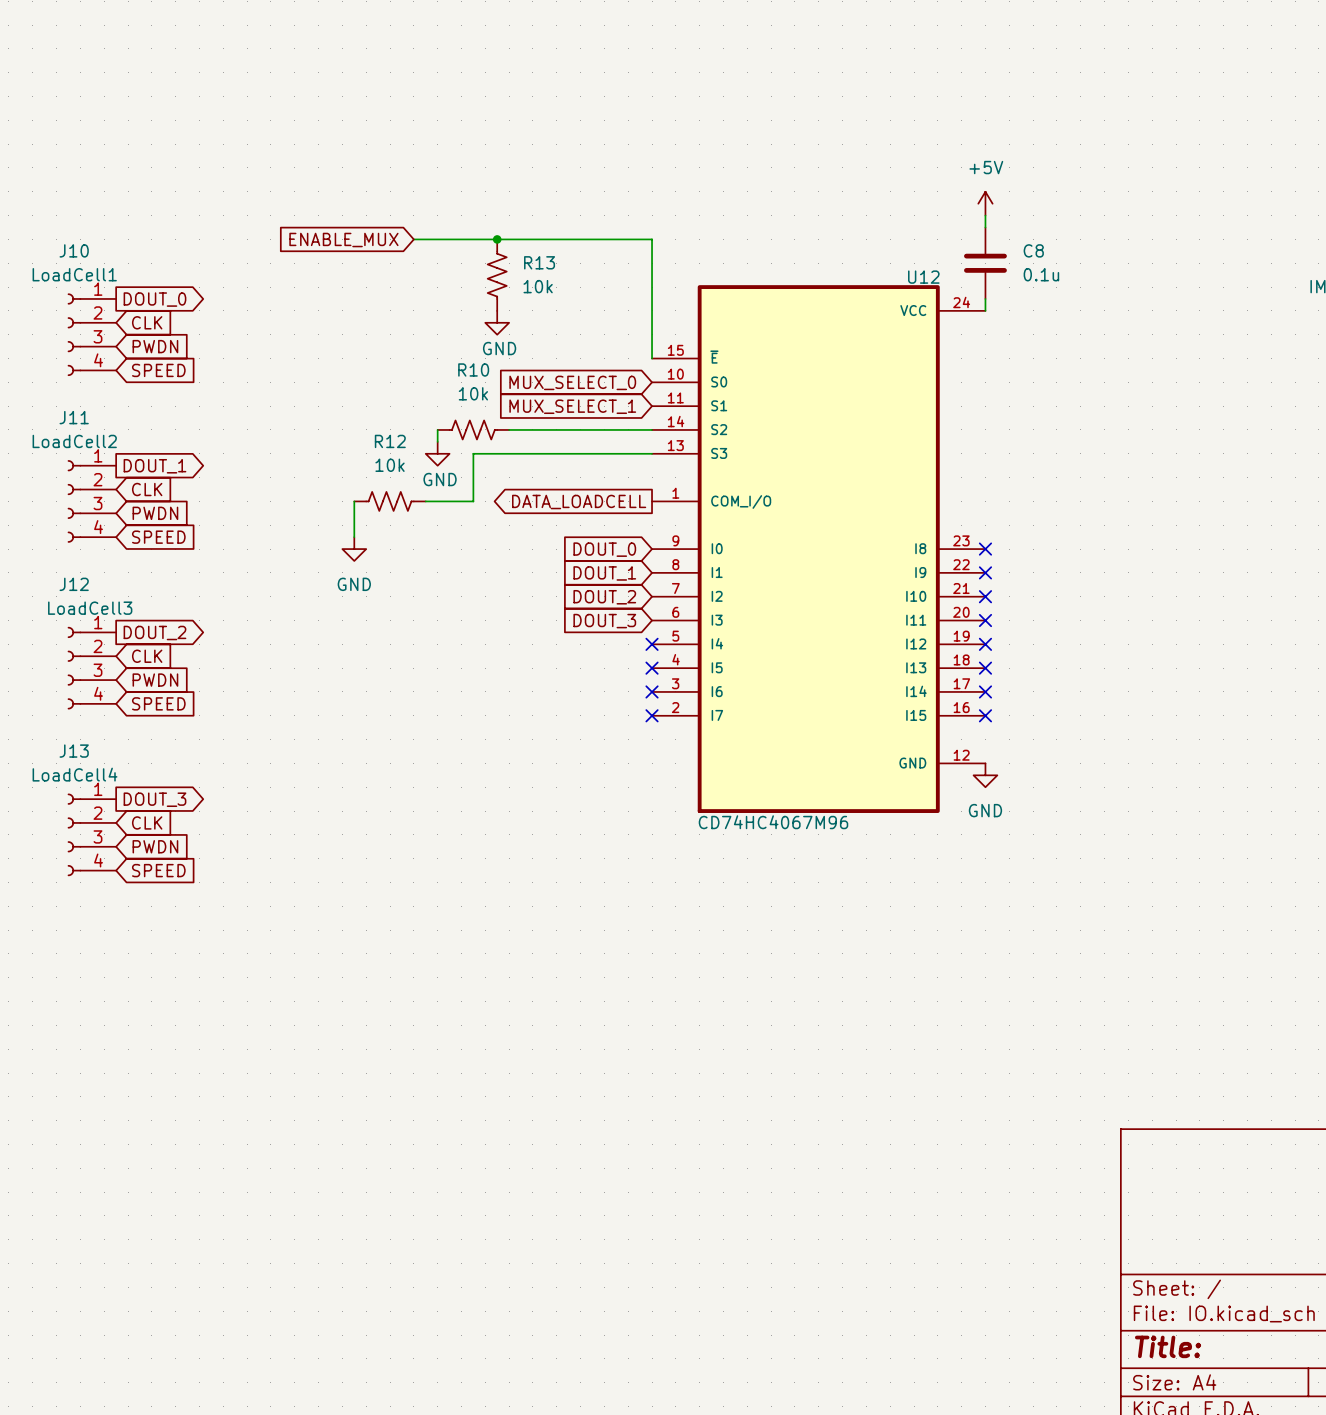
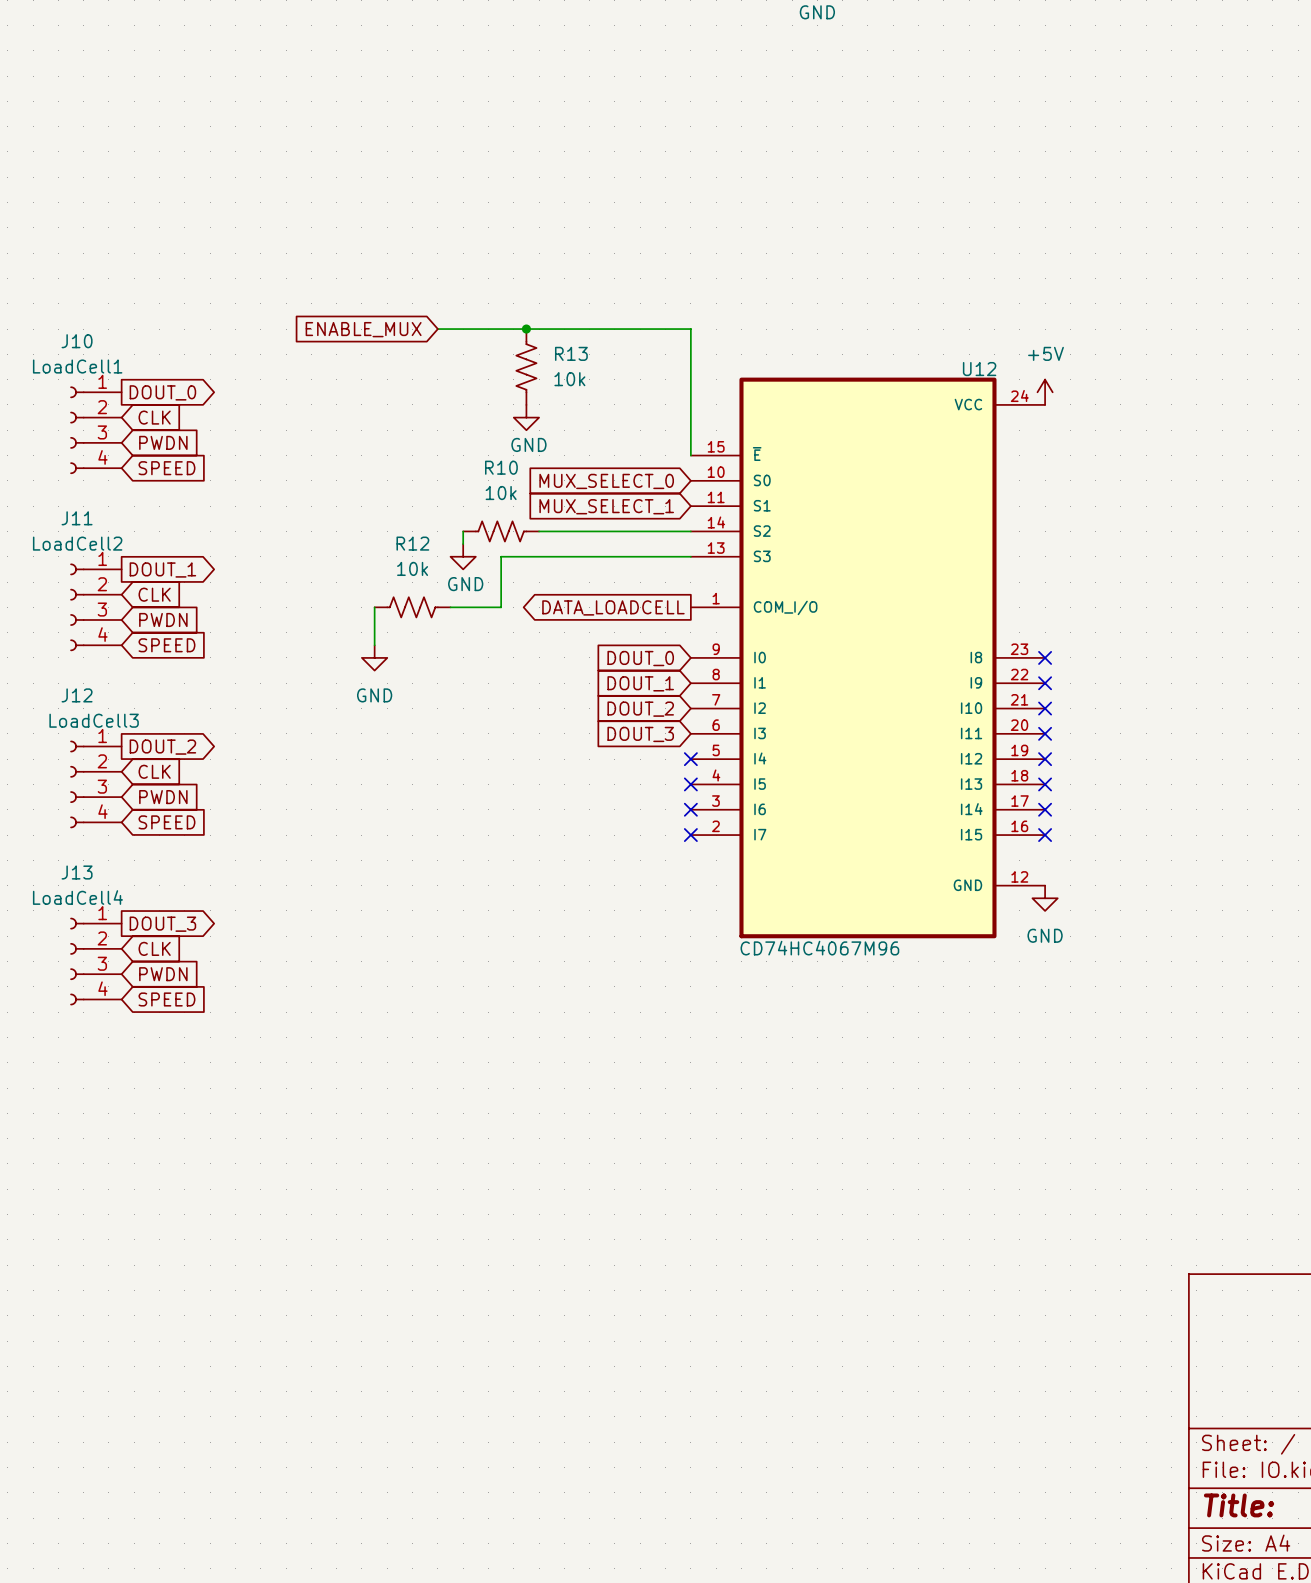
power symbol position: +5V (985, 203) -> +5V (1045, 392)
wire: (985, 215) (985, 227) -> none
C8: 0.1u (985, 263) -> none

